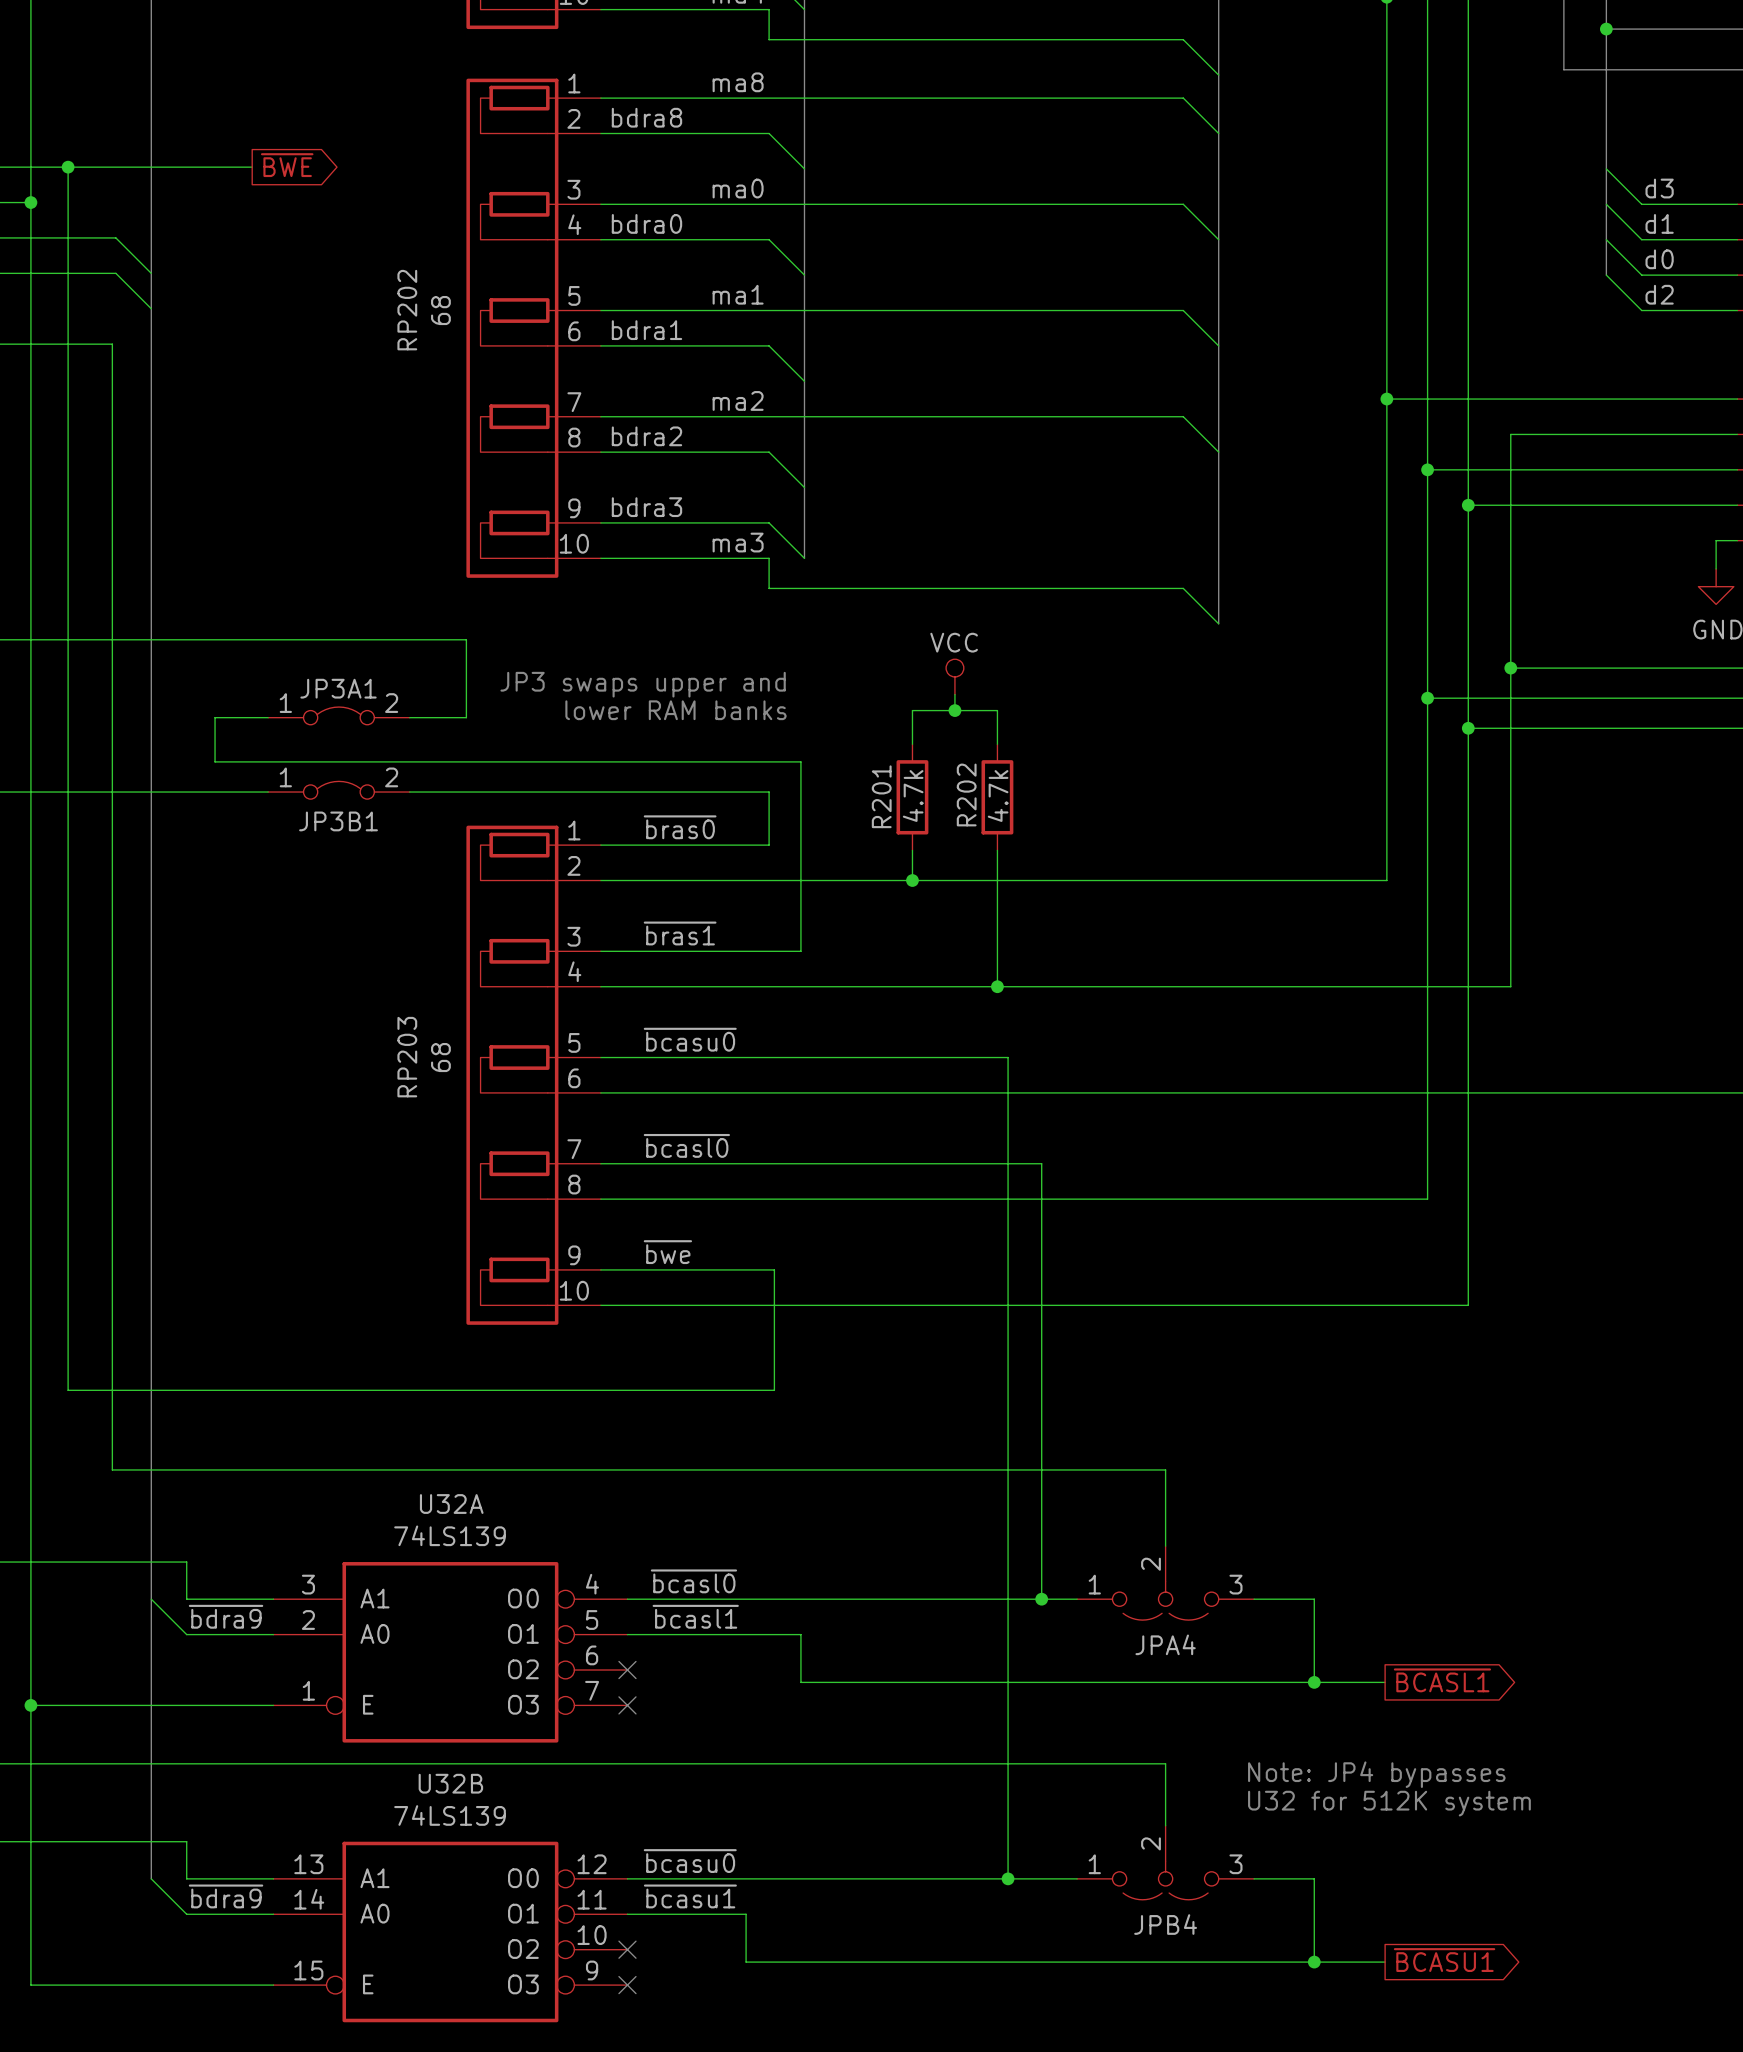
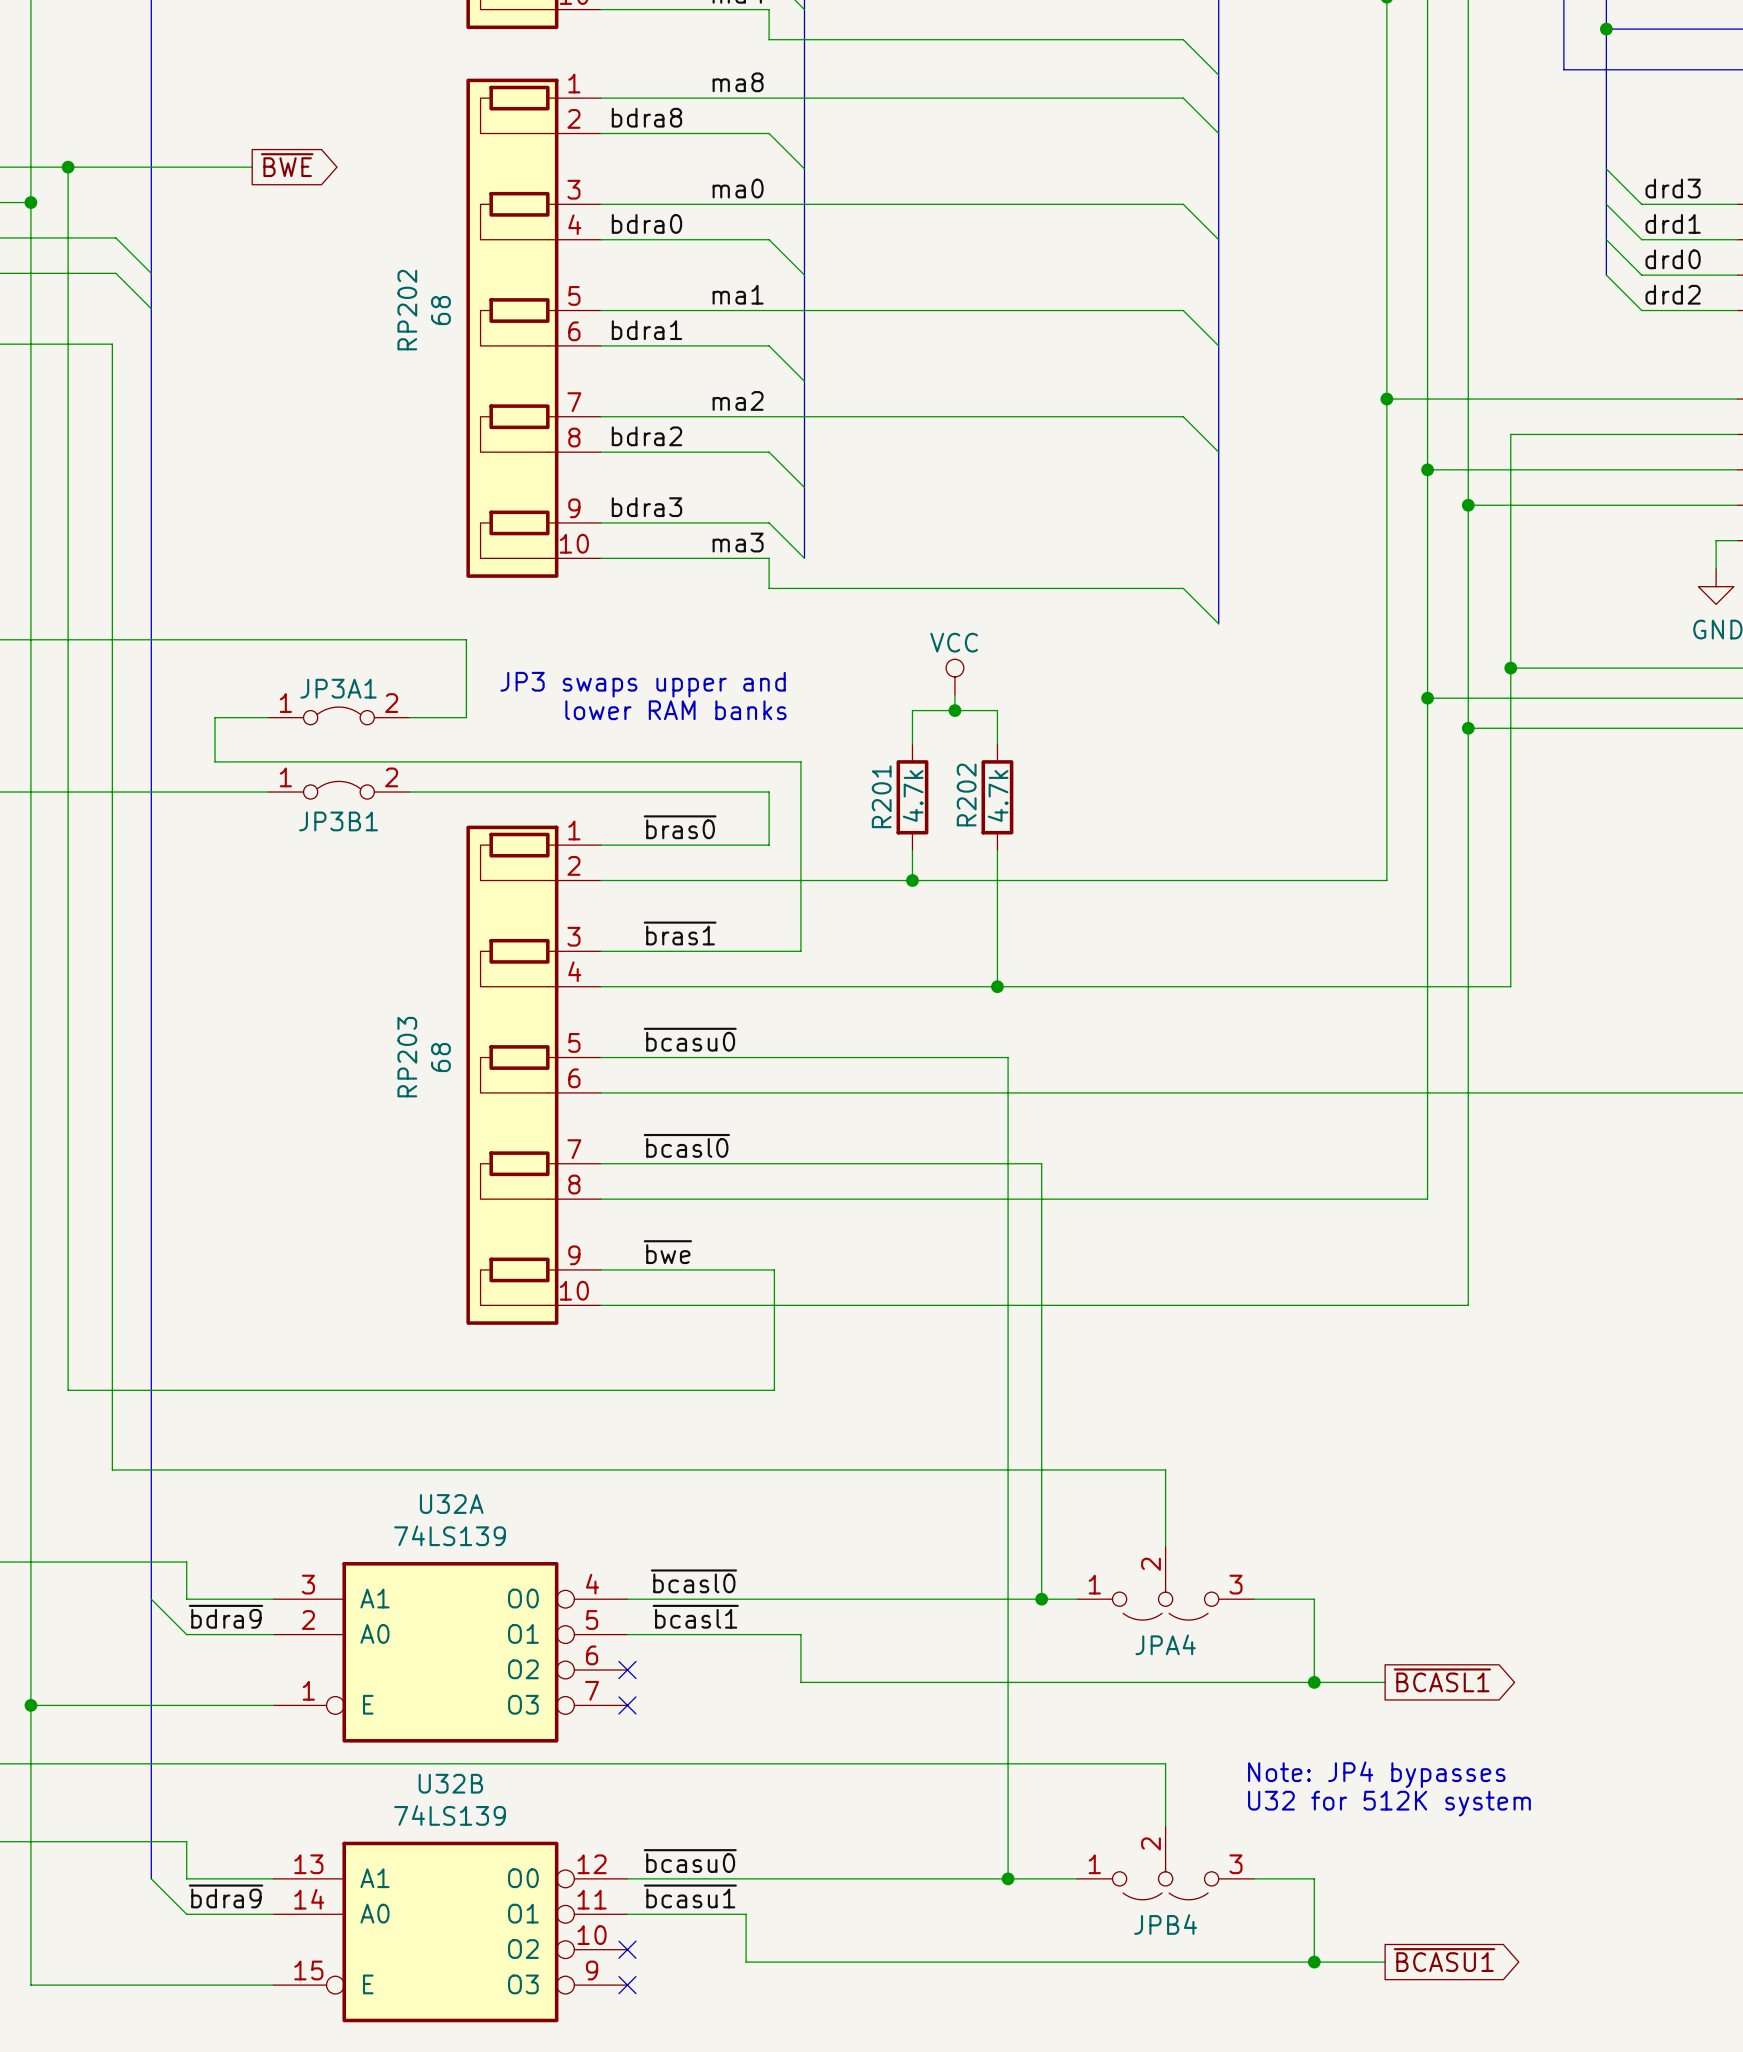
label: d3 (1659, 188) -> drd3 (1673, 188)
label: d1 (1659, 223) -> drd1 (1673, 223)
label: d0 (1659, 259) -> drd0 (1673, 259)
label: d2 (1659, 294) -> drd2 (1673, 294)

